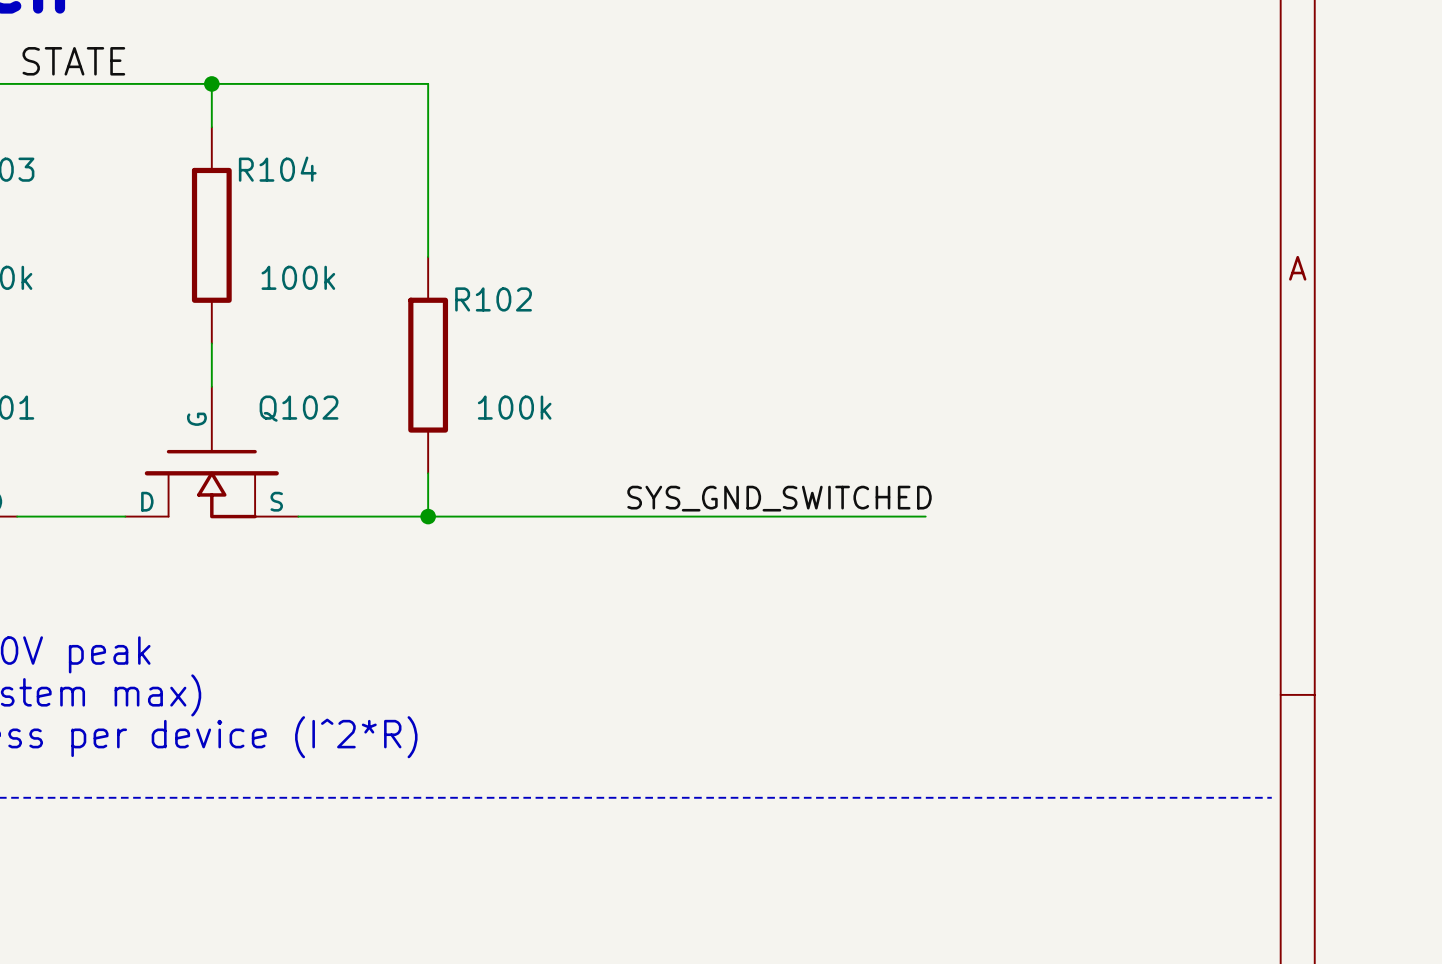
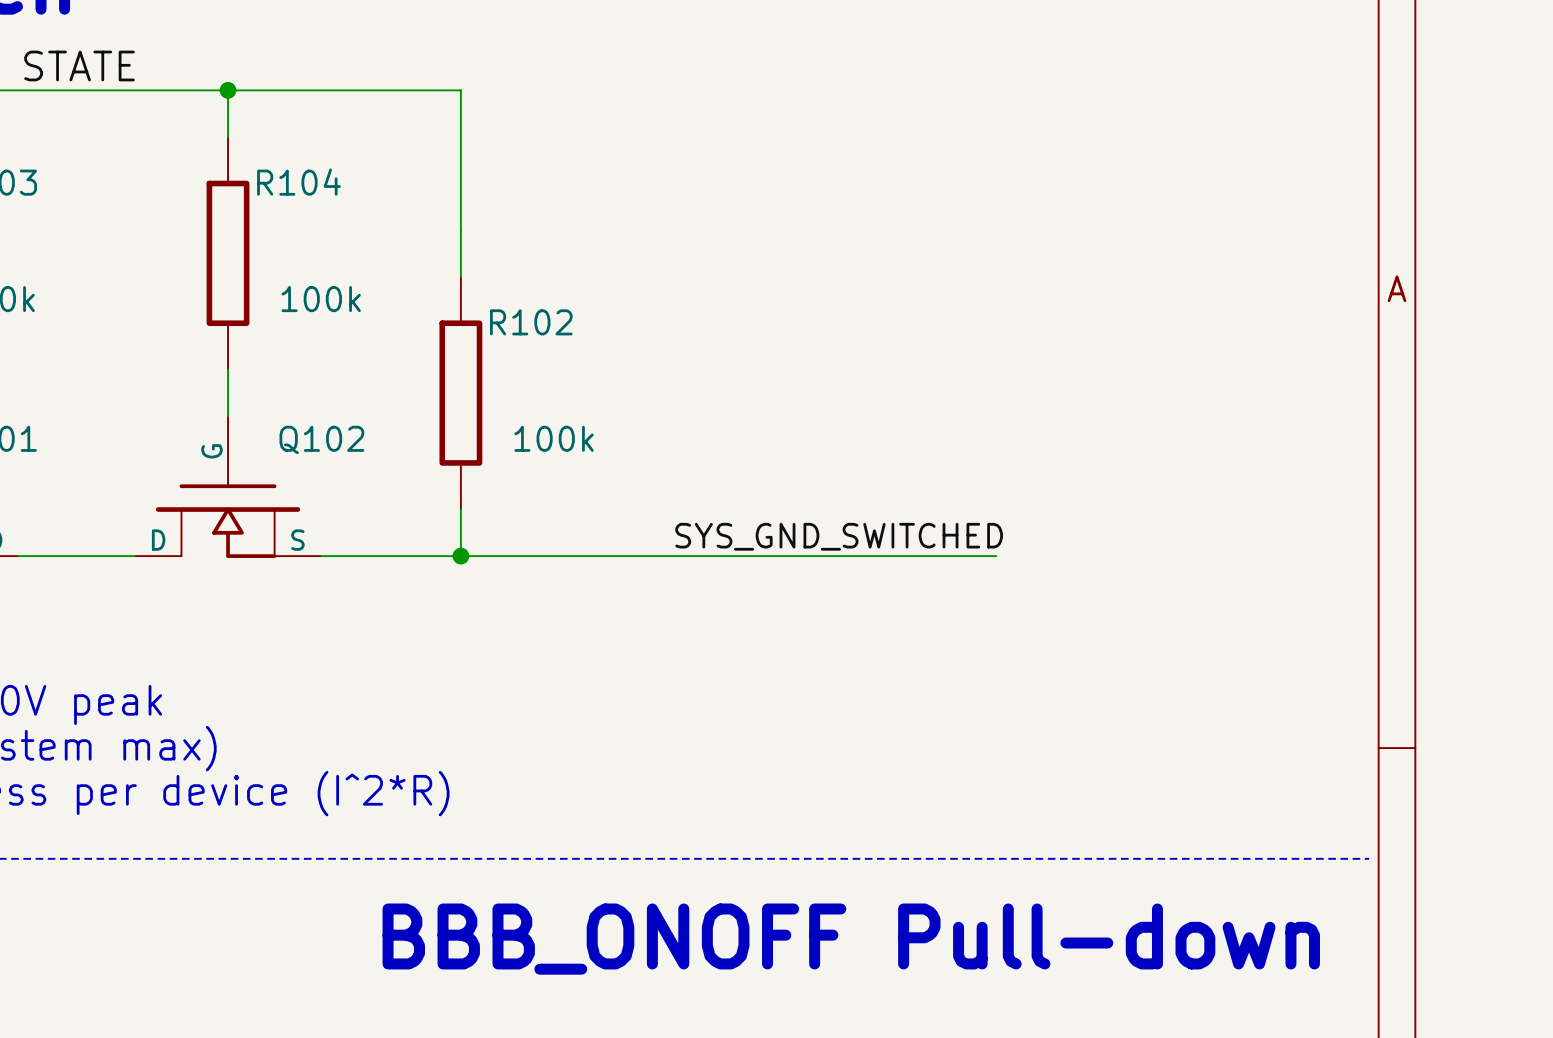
text: none -> BBB_ONOFF Pull-down (851, 939)

